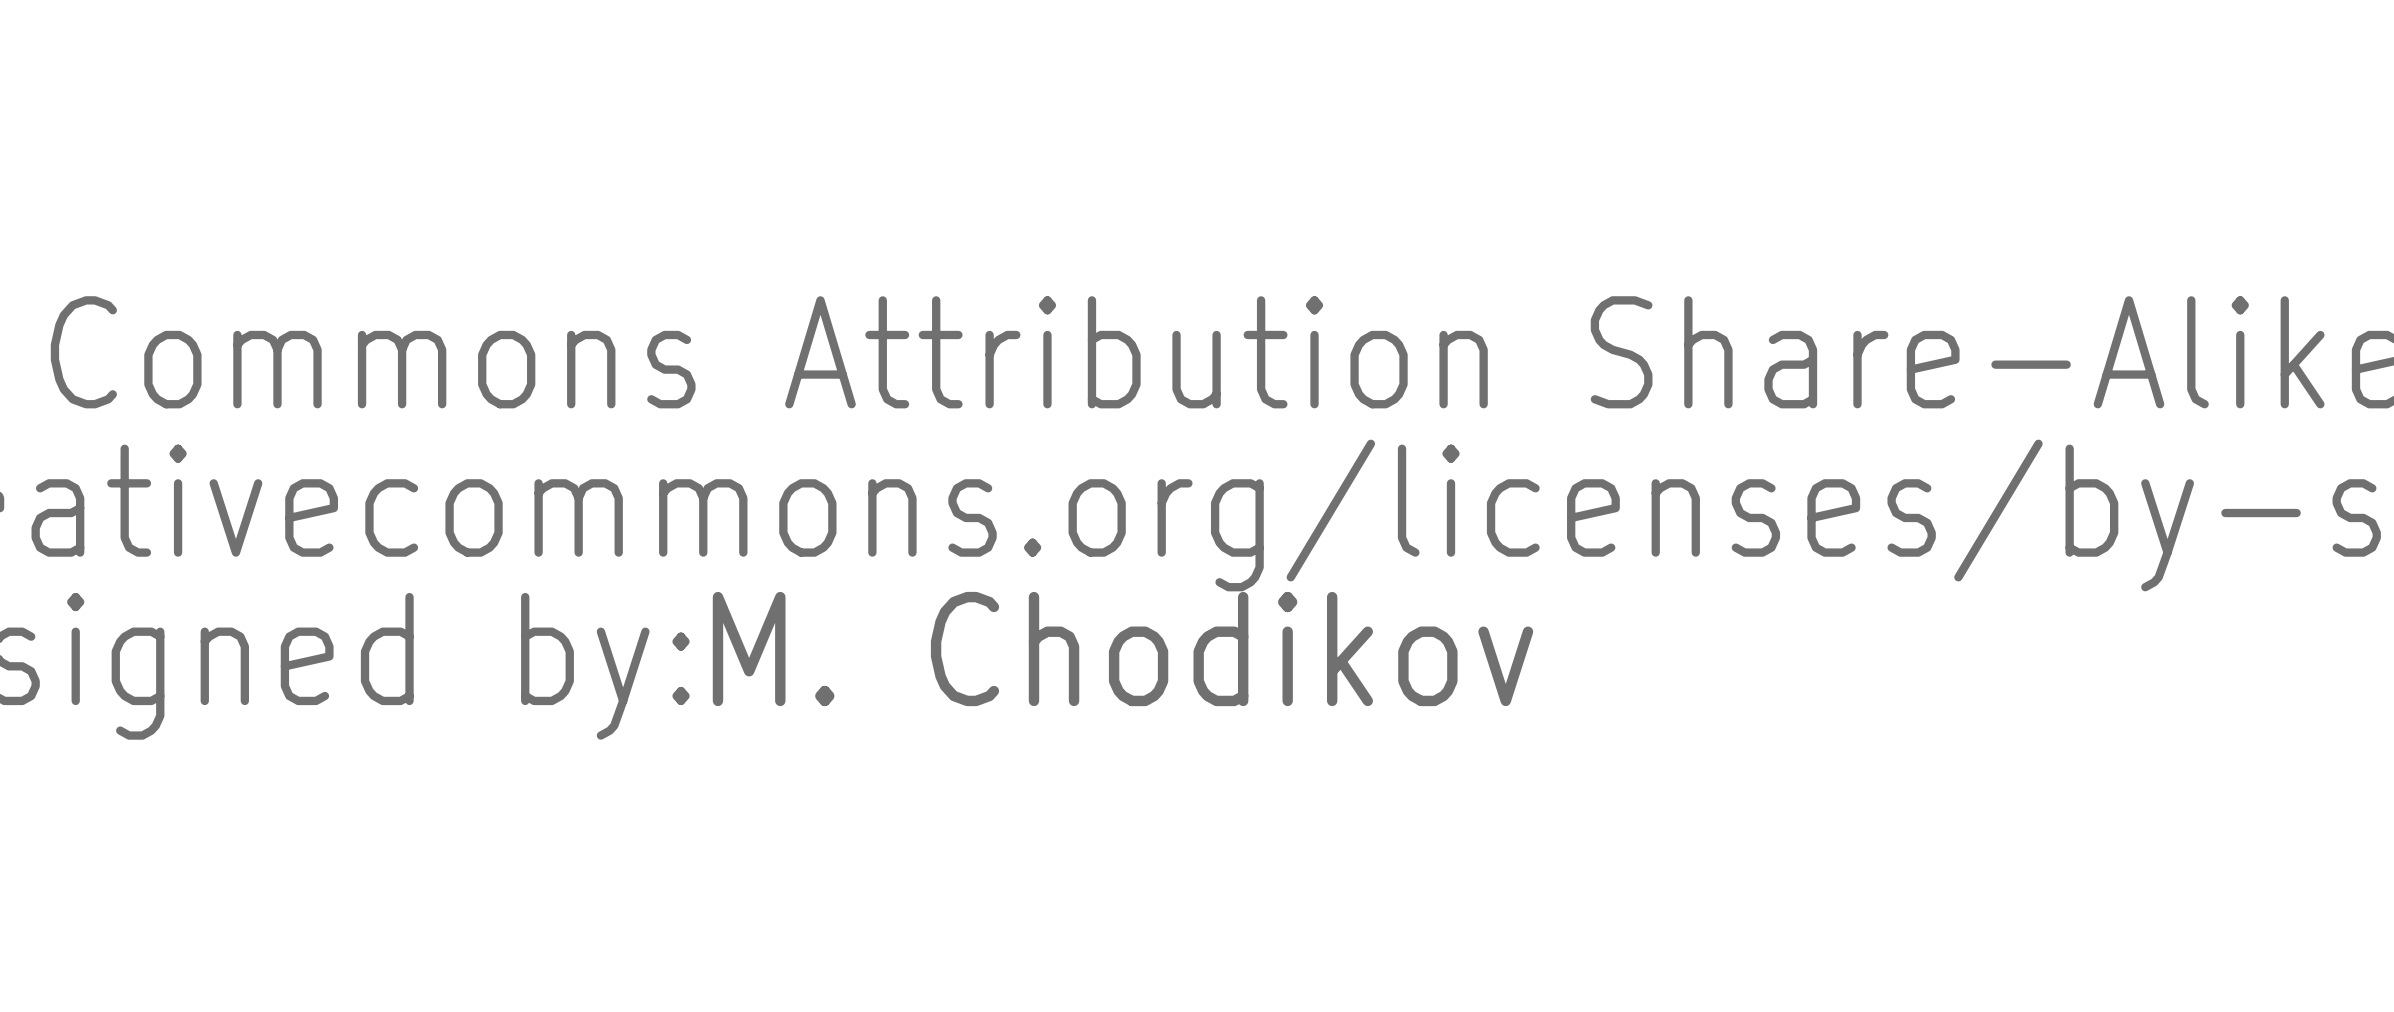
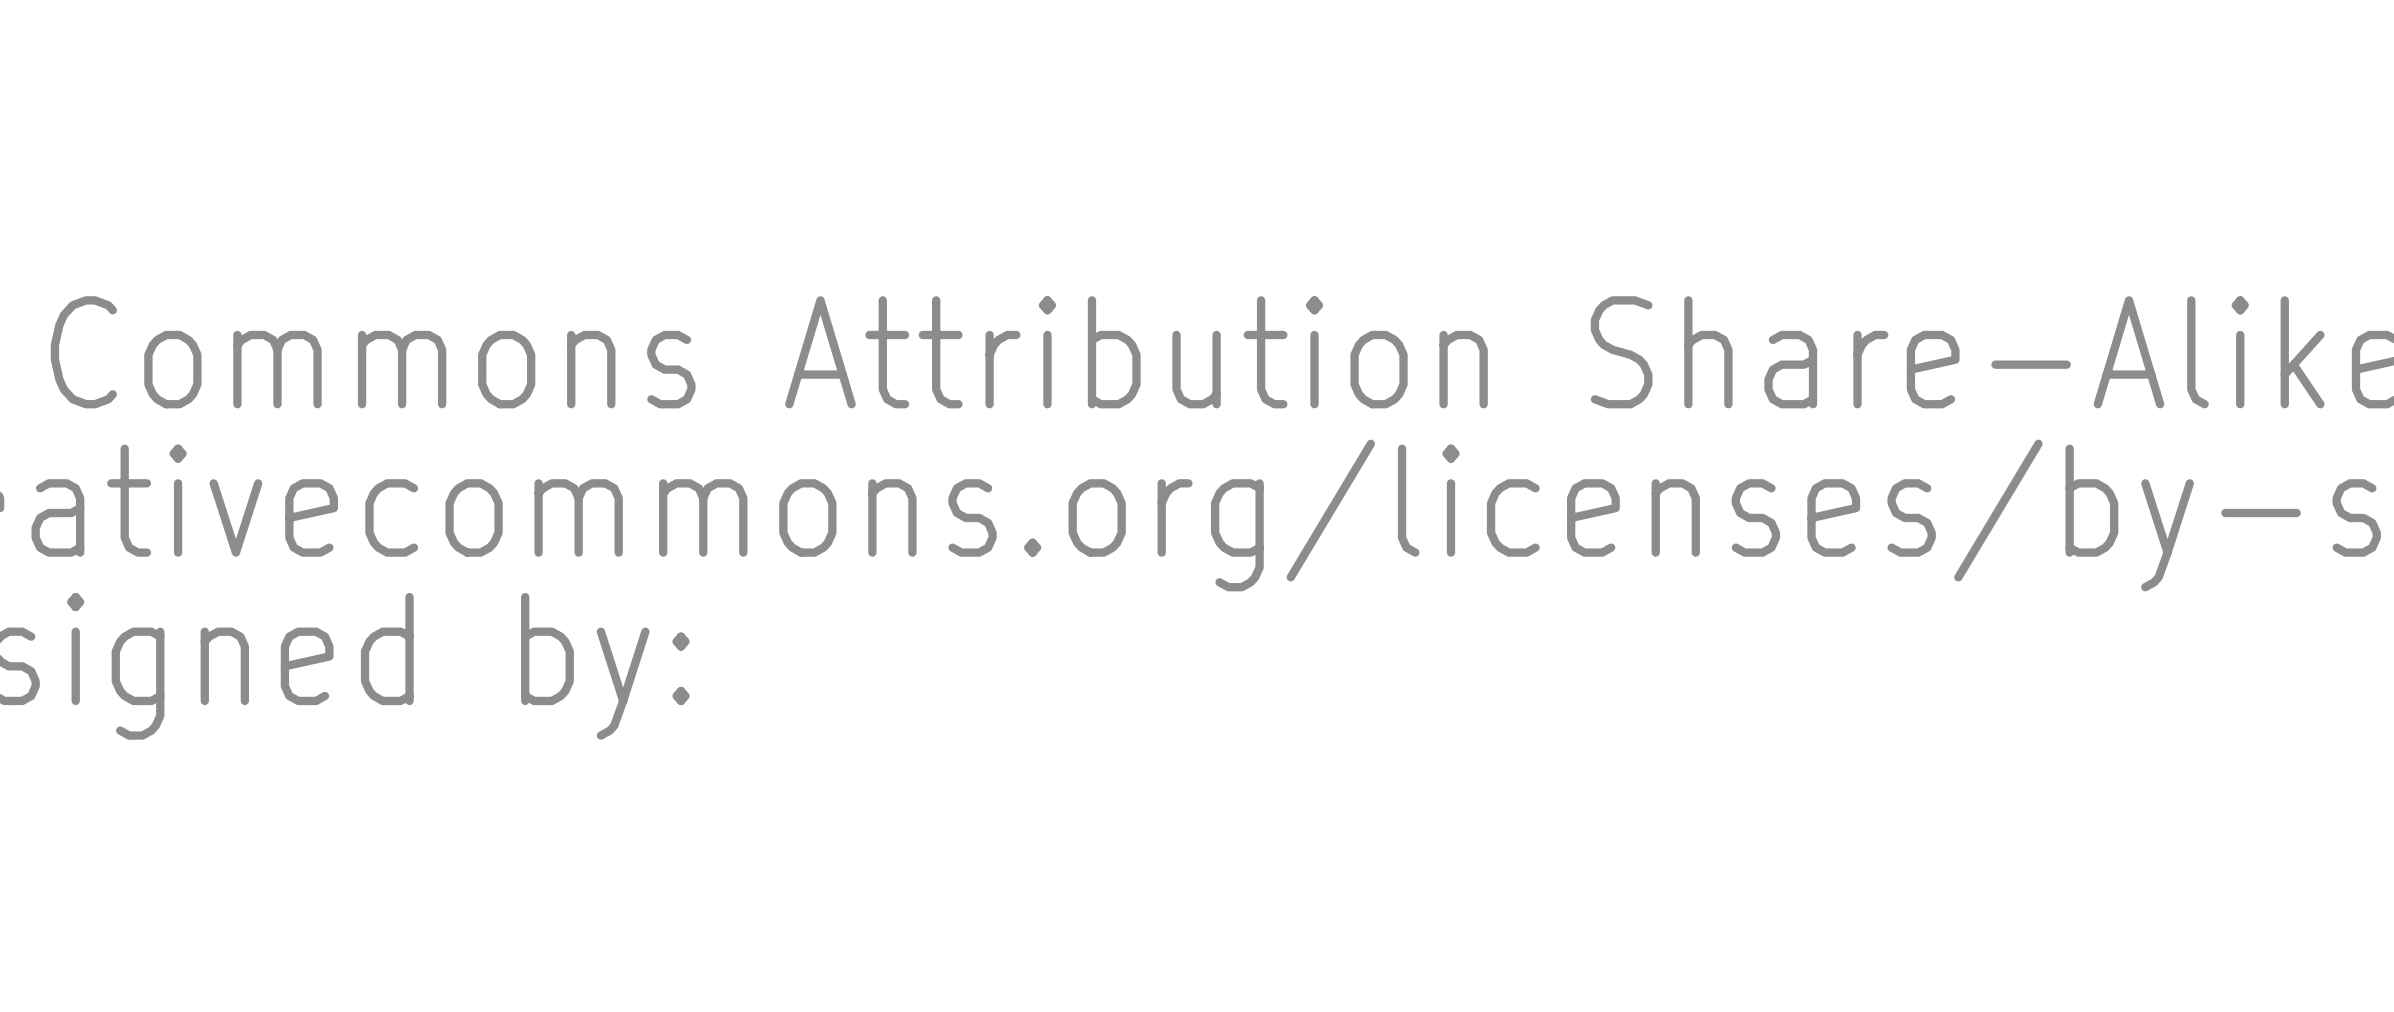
text: M. Chodikov (1123, 649) -> none

